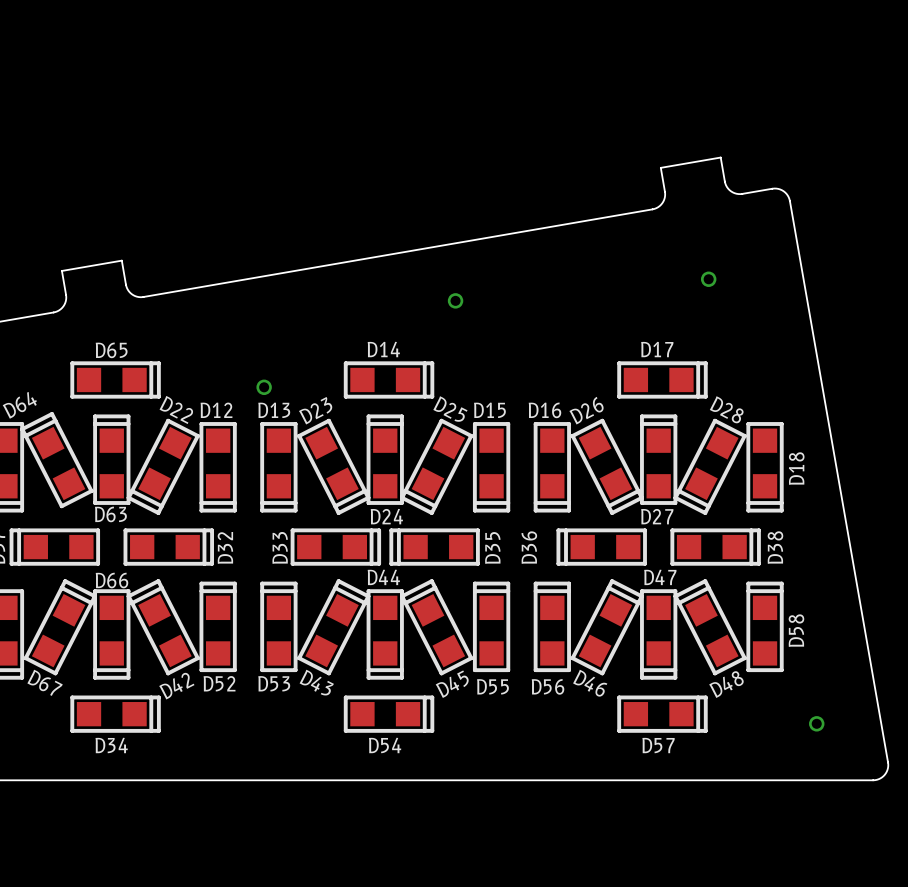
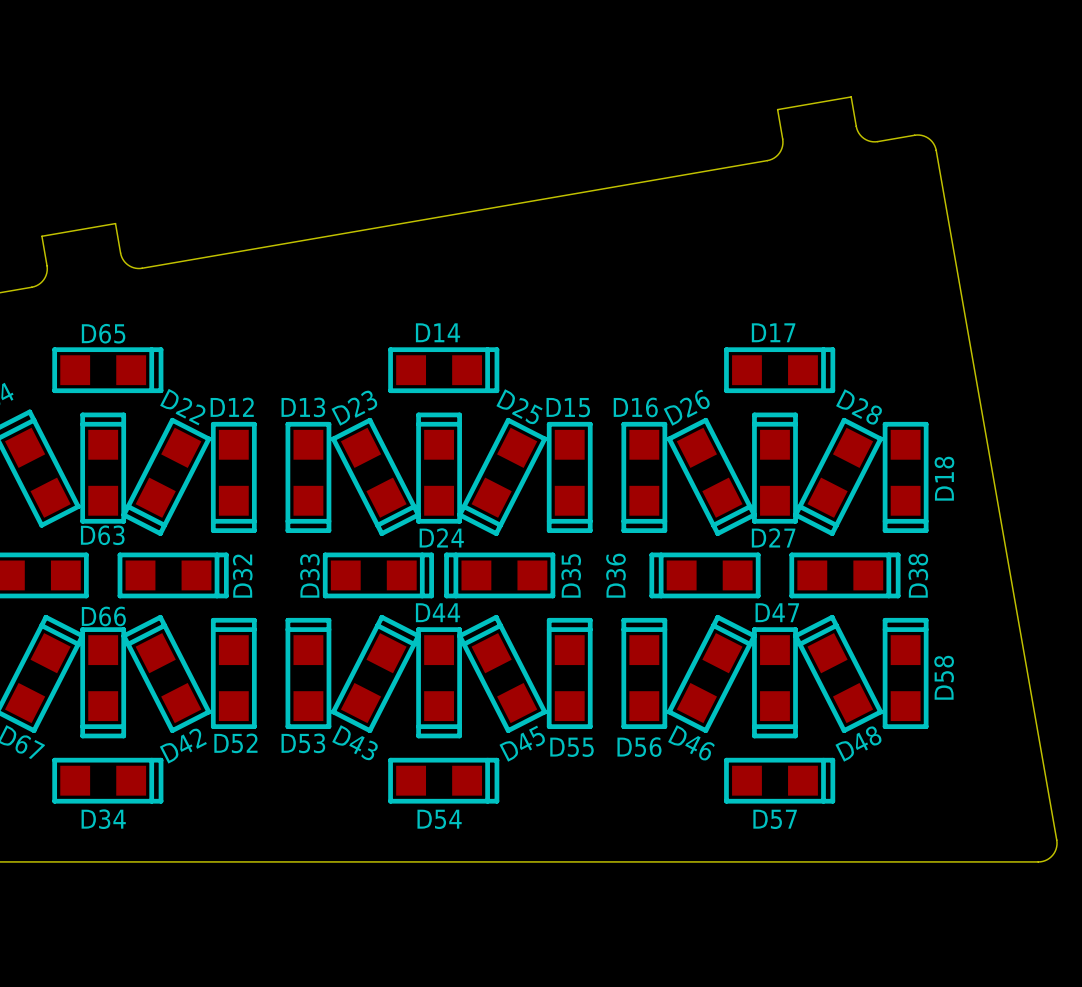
part: (708, 279) -> none
part: (455, 300) -> none
part: (264, 387) -> none
part: (816, 723) -> none

